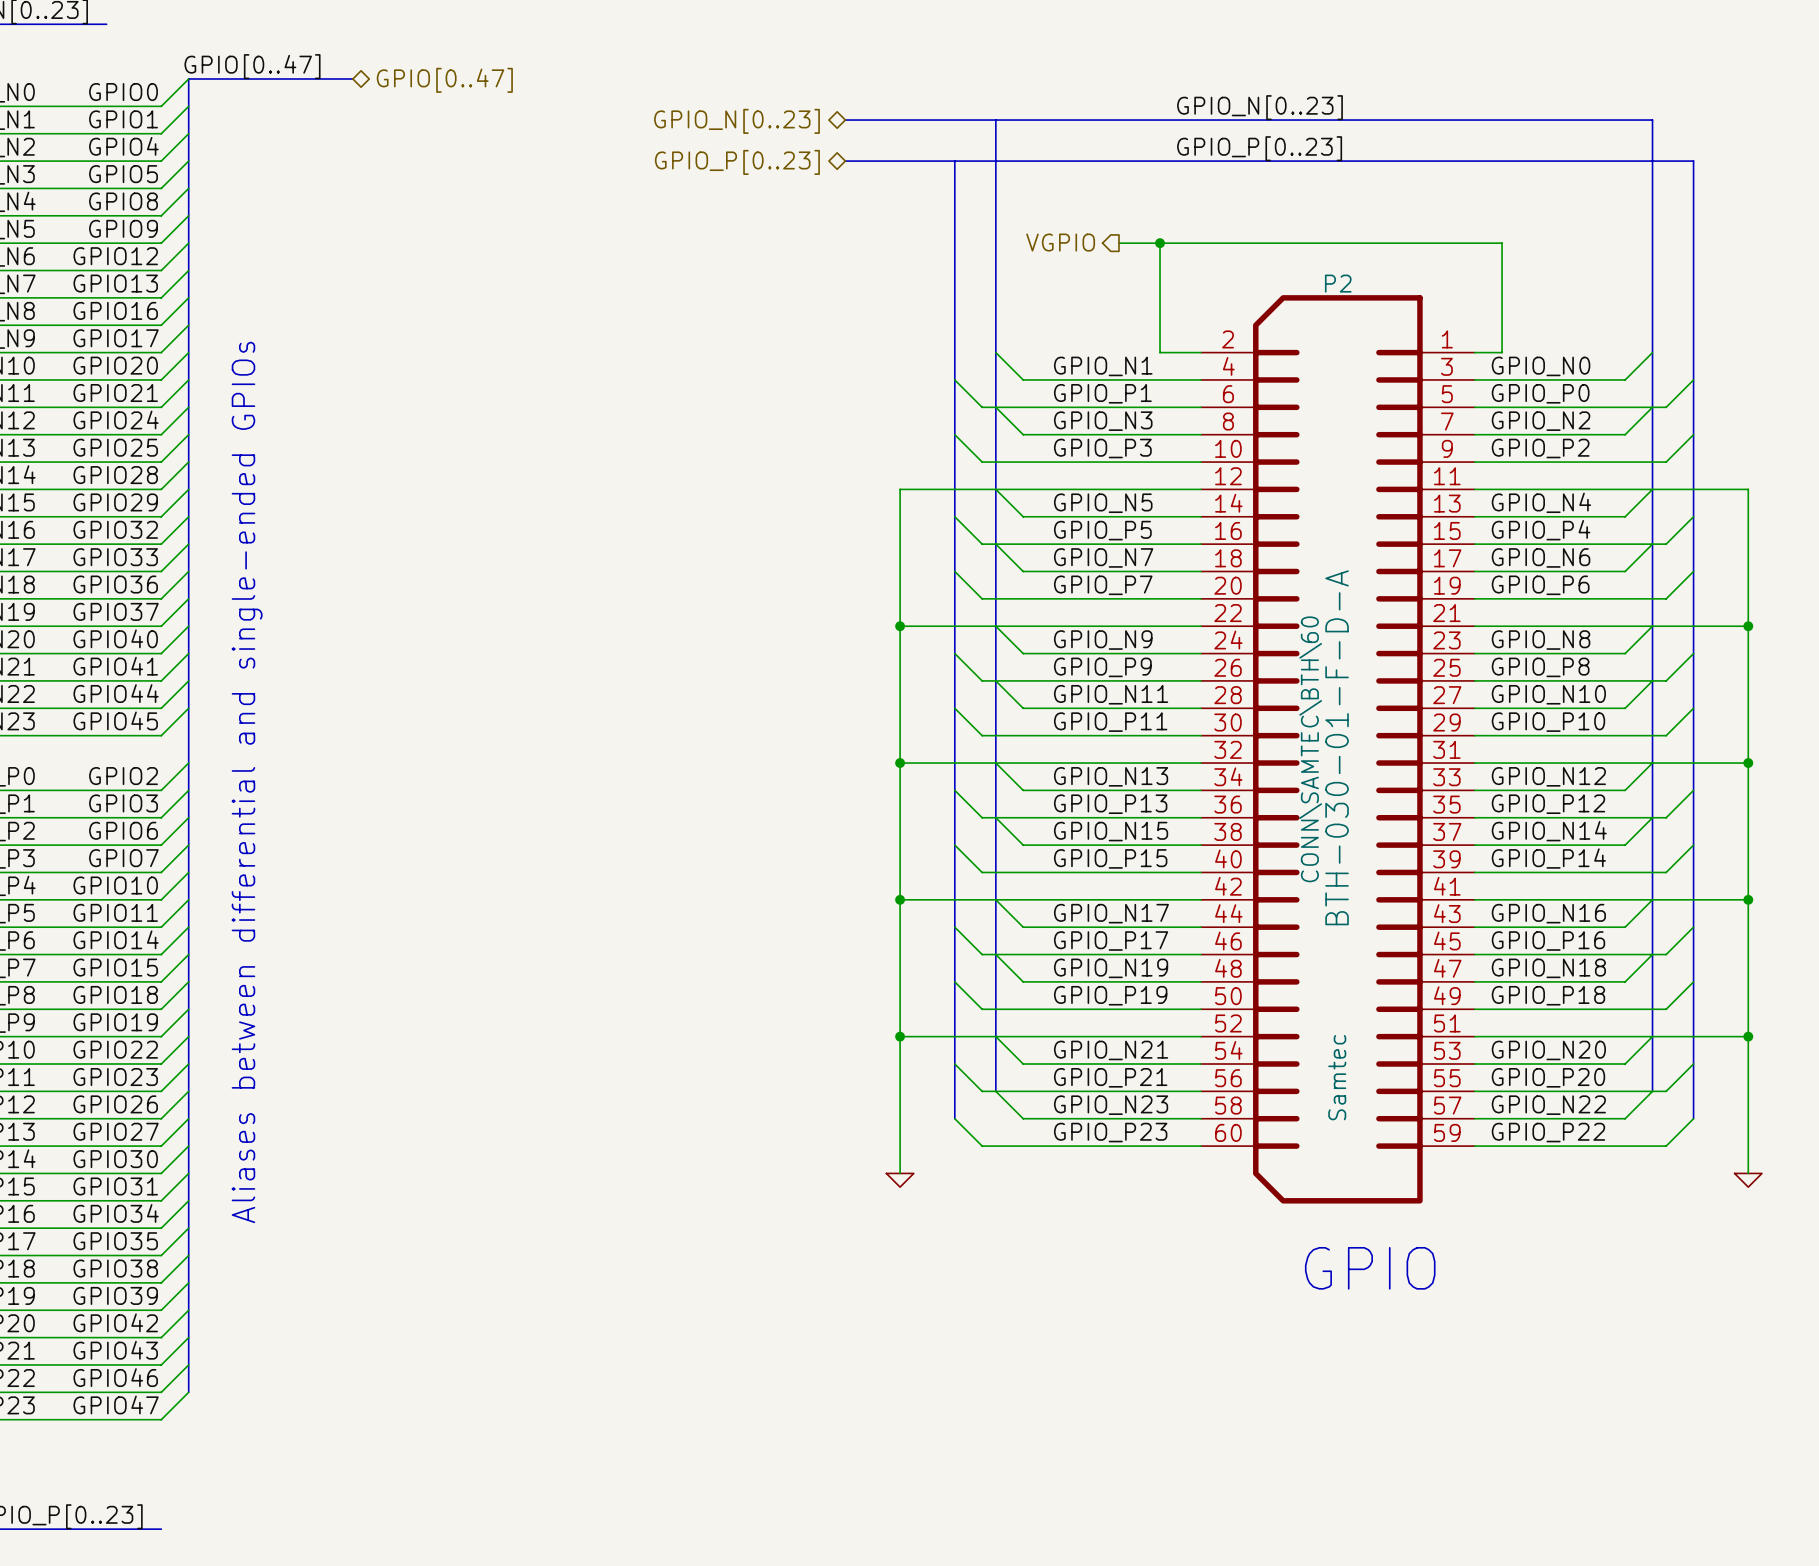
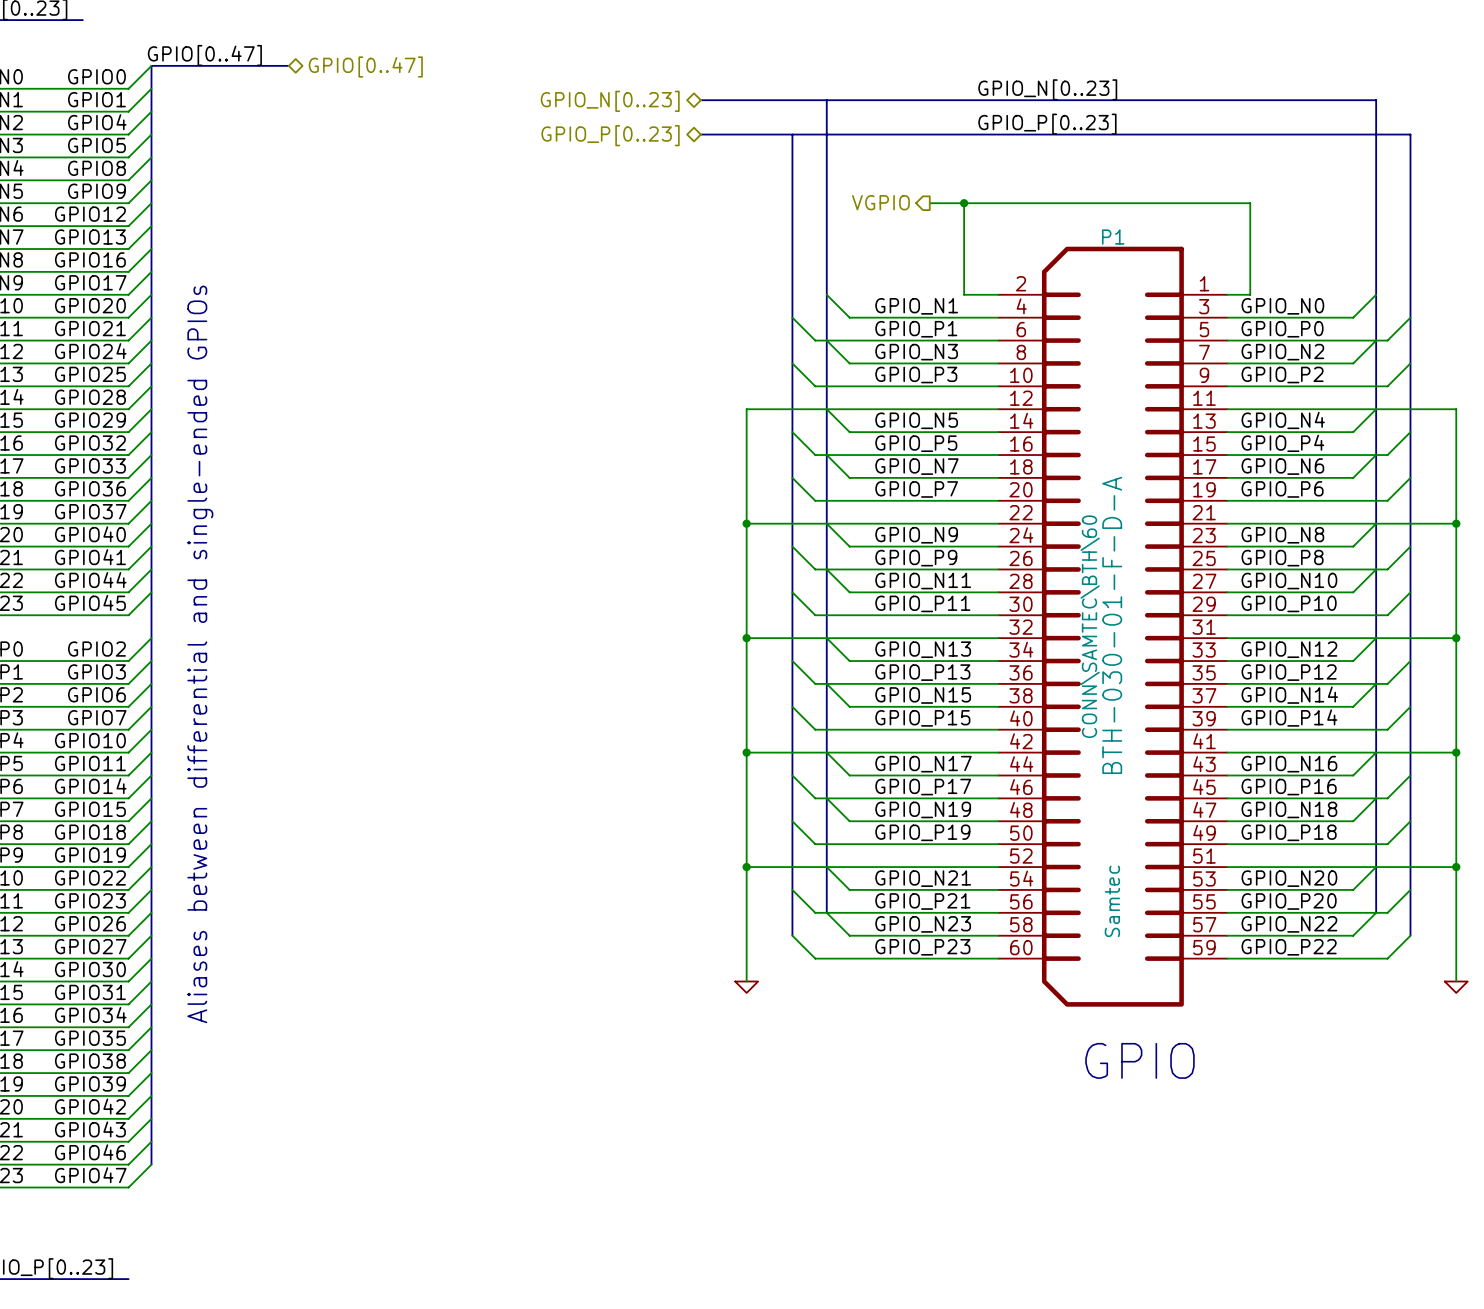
P2 name: P2 (1338, 283) -> P1 (1113, 237)

